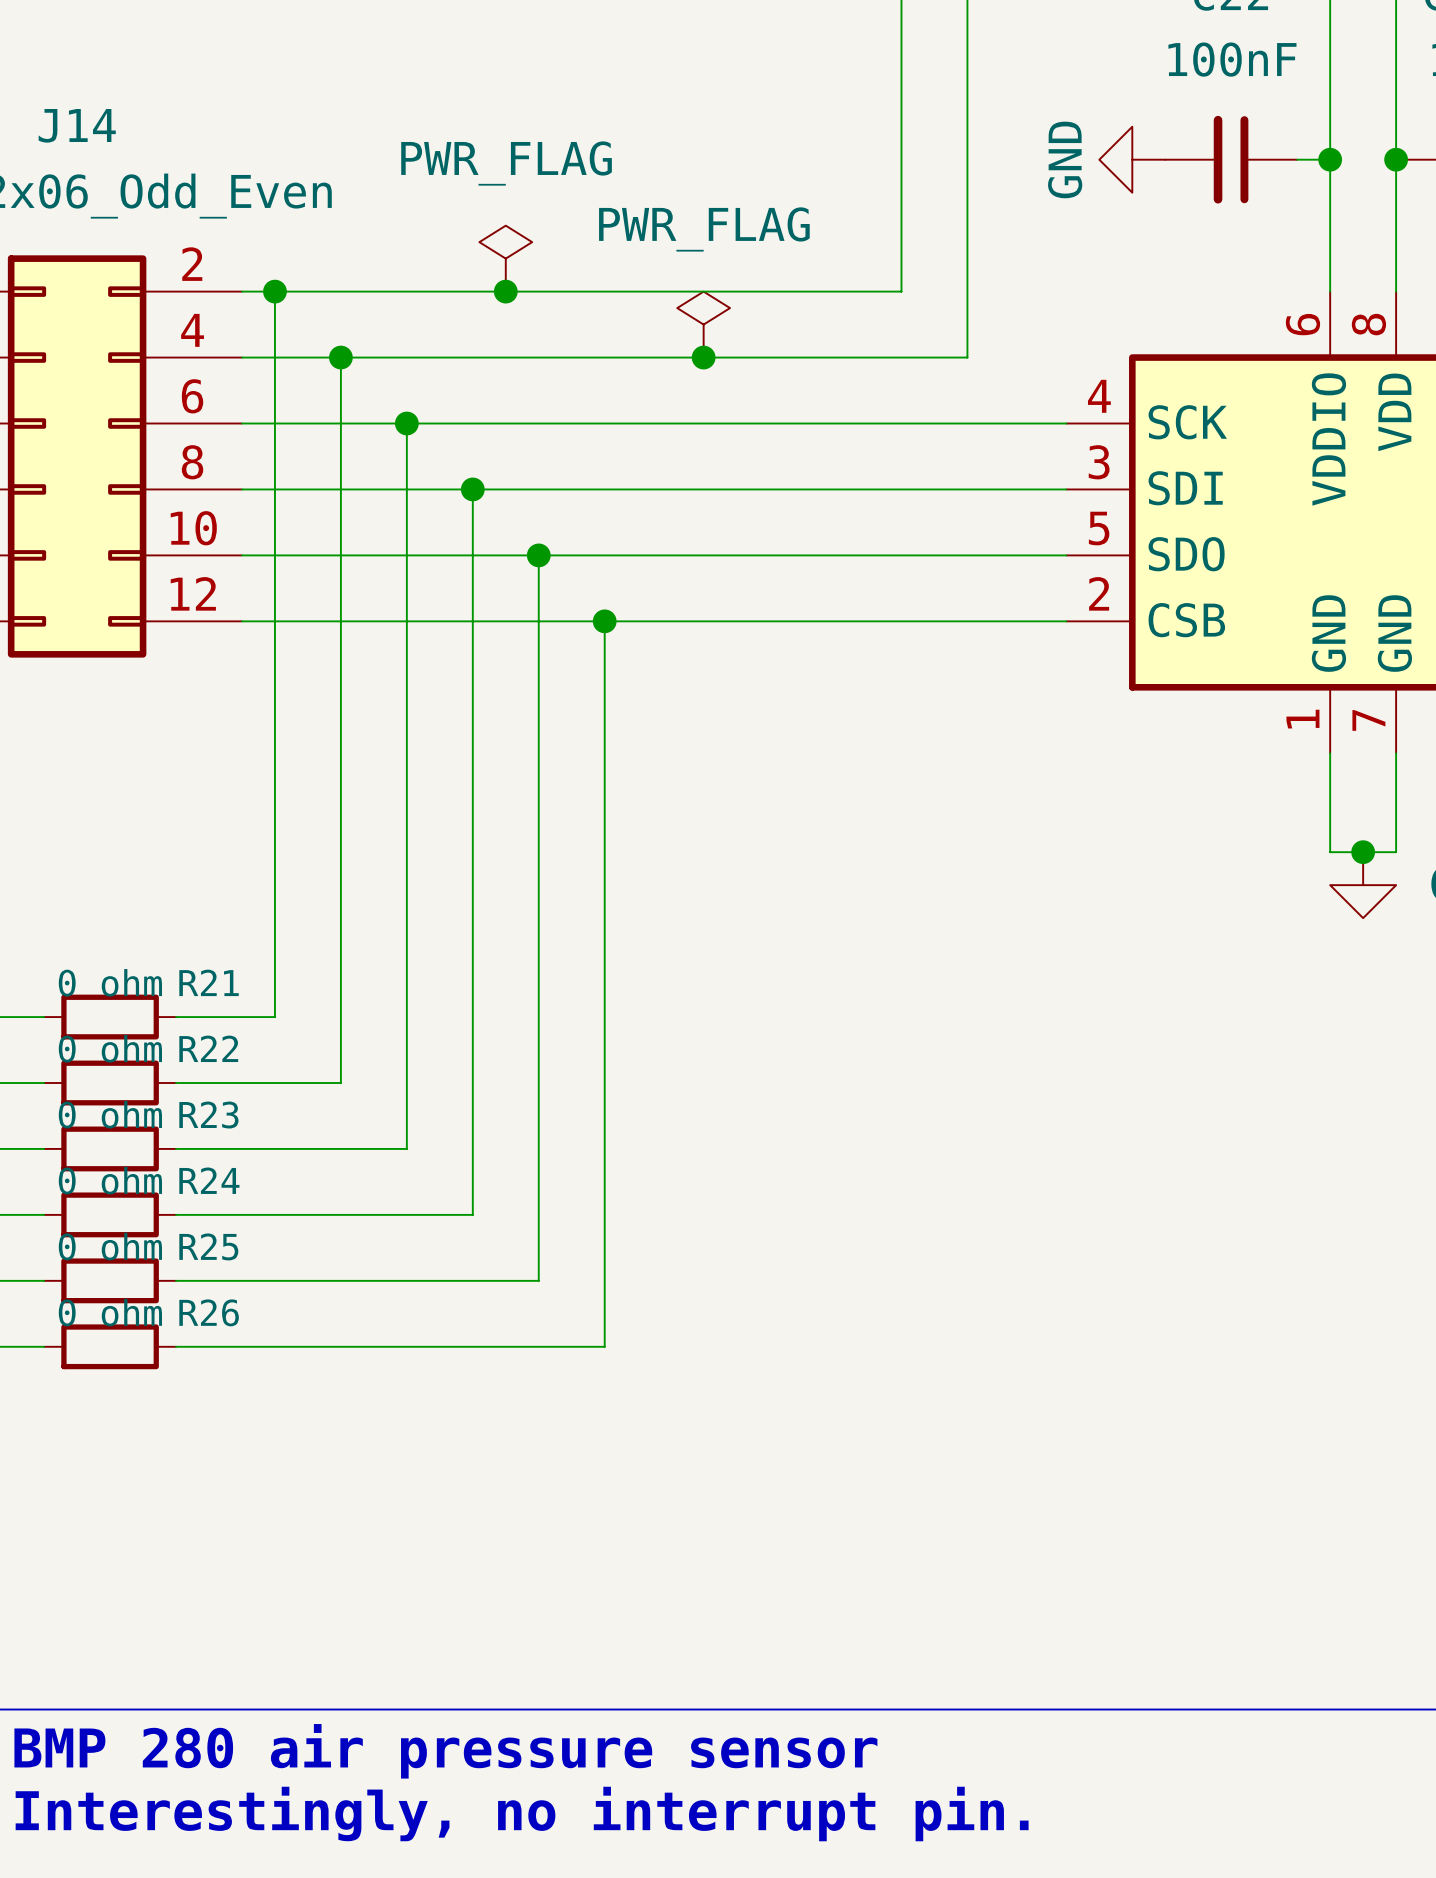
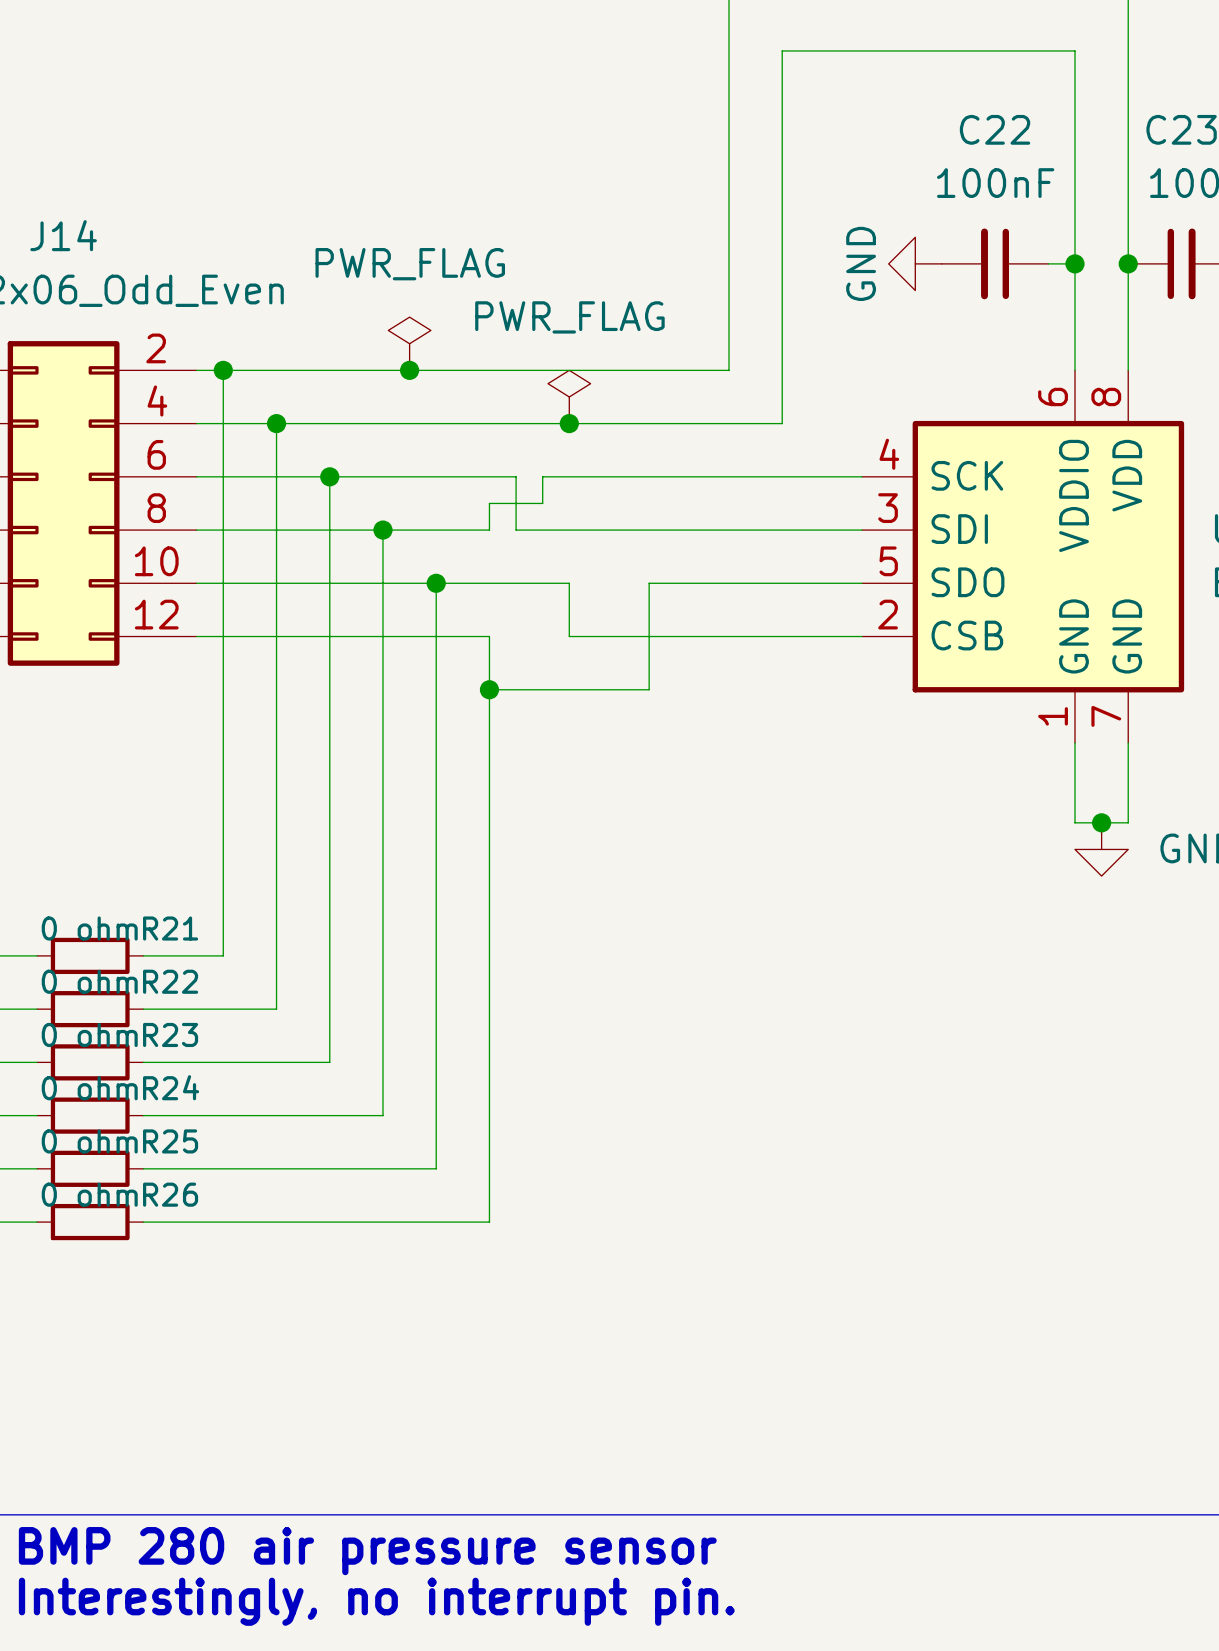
wire: (637, 423) (670, 423) -> (516, 476) (516, 530)
wire: (604, 489) (637, 489) -> (489, 530) (489, 503) (542, 503) (542, 476)
wire: (703, 555) (802, 555) -> (569, 583) (569, 636)
wire: none -> (649, 583) (649, 689) (489, 689)
wire: (604, 621) (703, 621) -> none
junction position: (604, 621) -> (489, 689)

